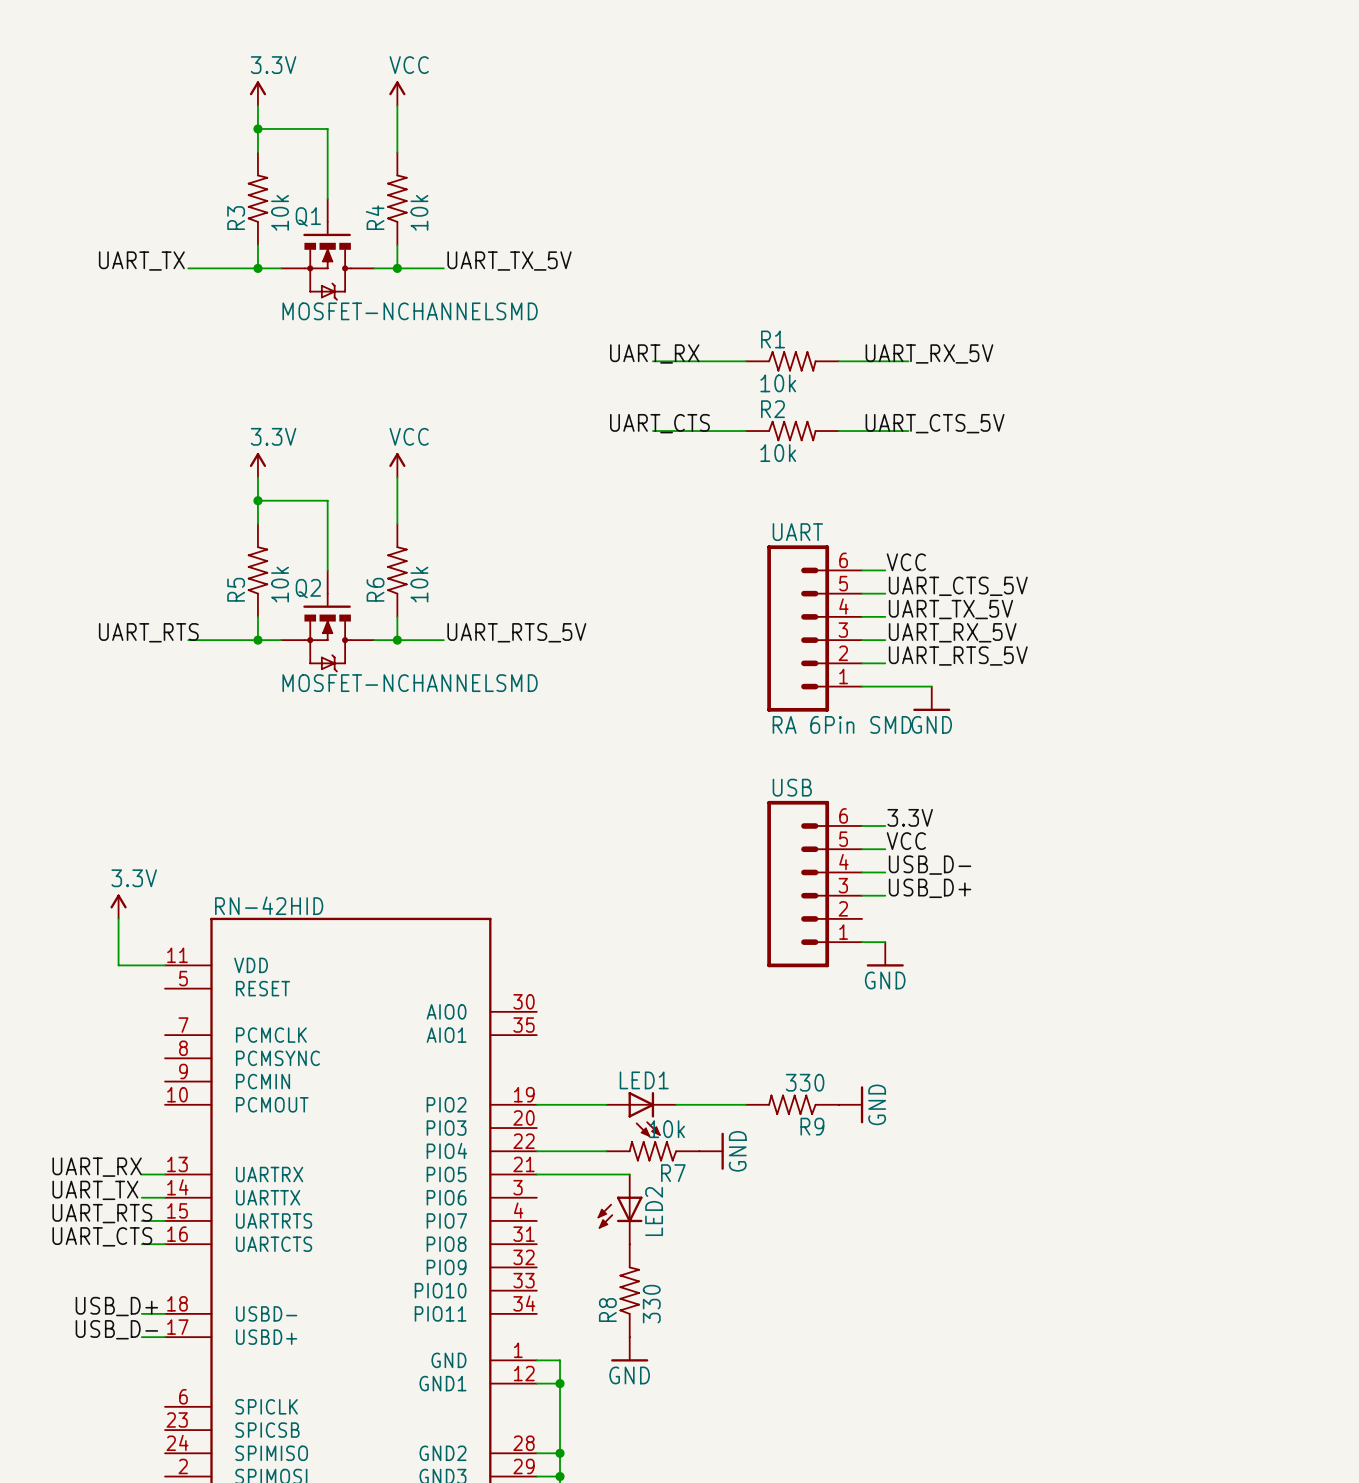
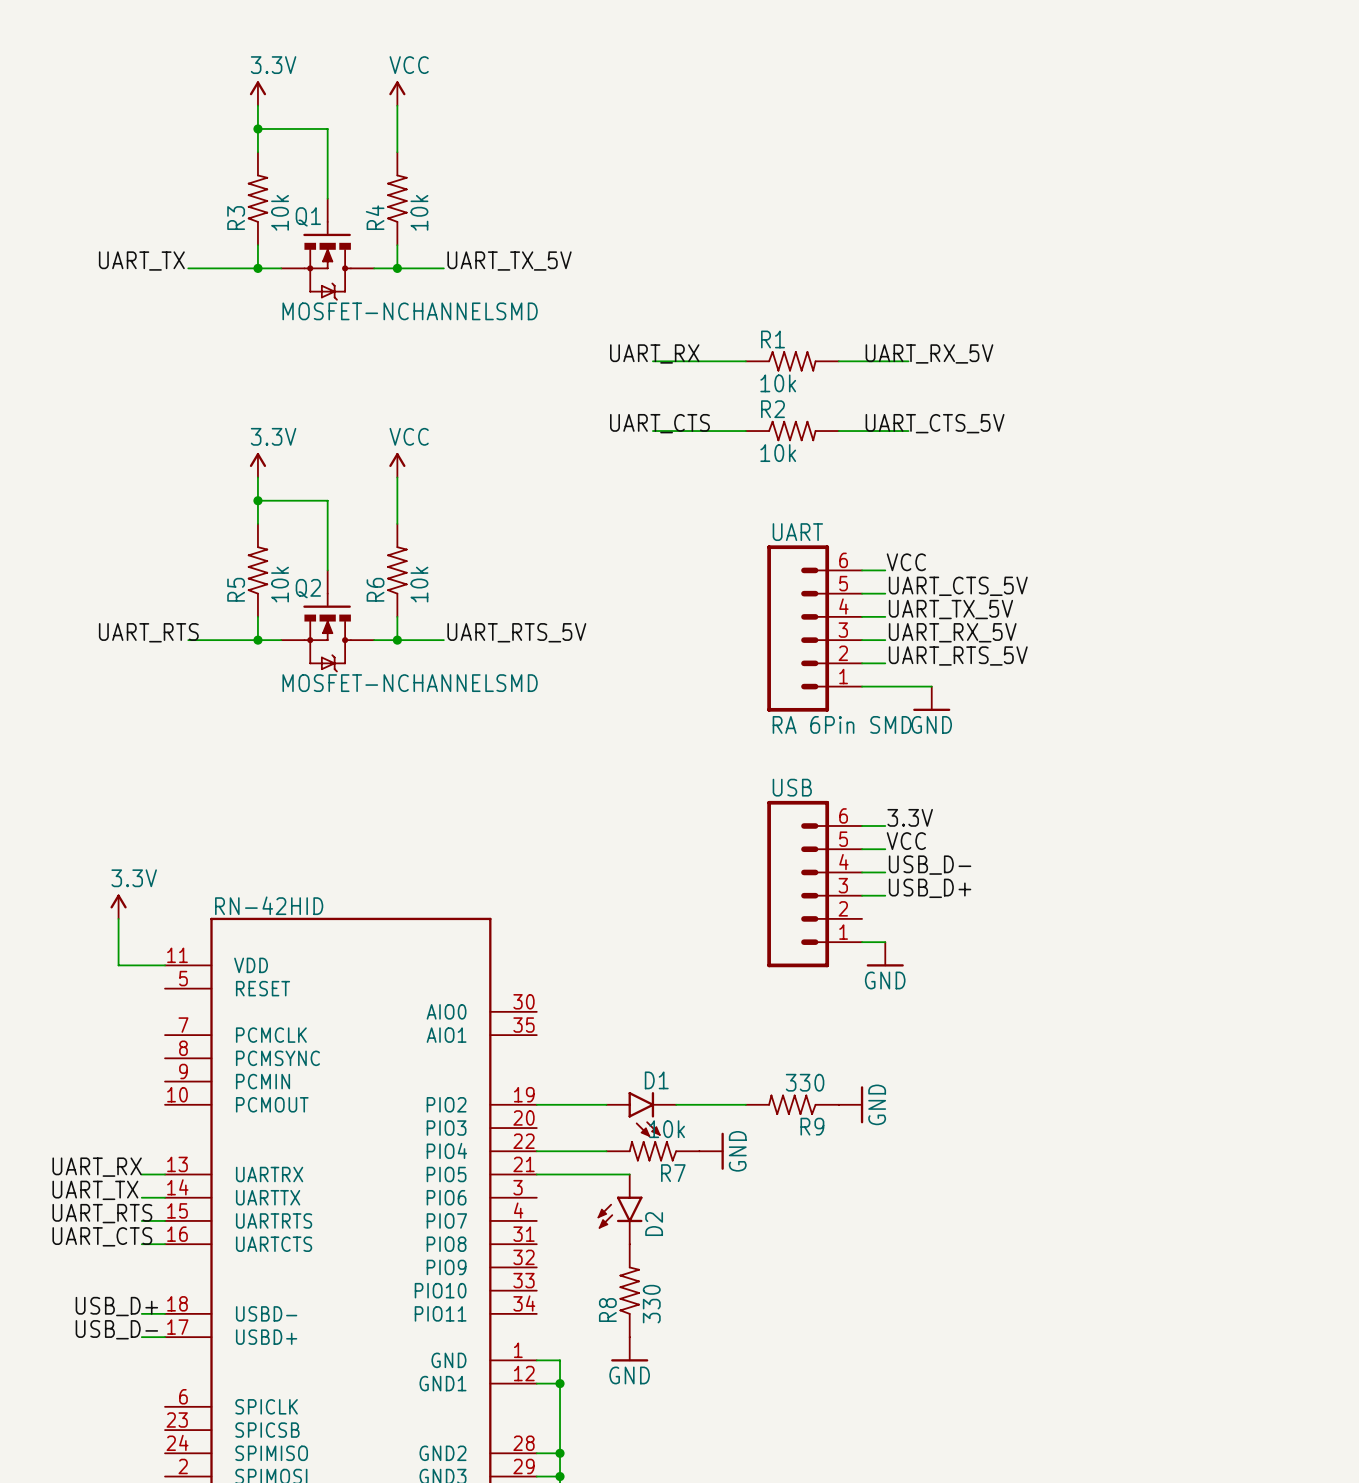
LED1: (641, 1114) -> none
D1: none -> (641, 1114)
LED2: (620, 1209) -> none
D2: none -> (620, 1209)

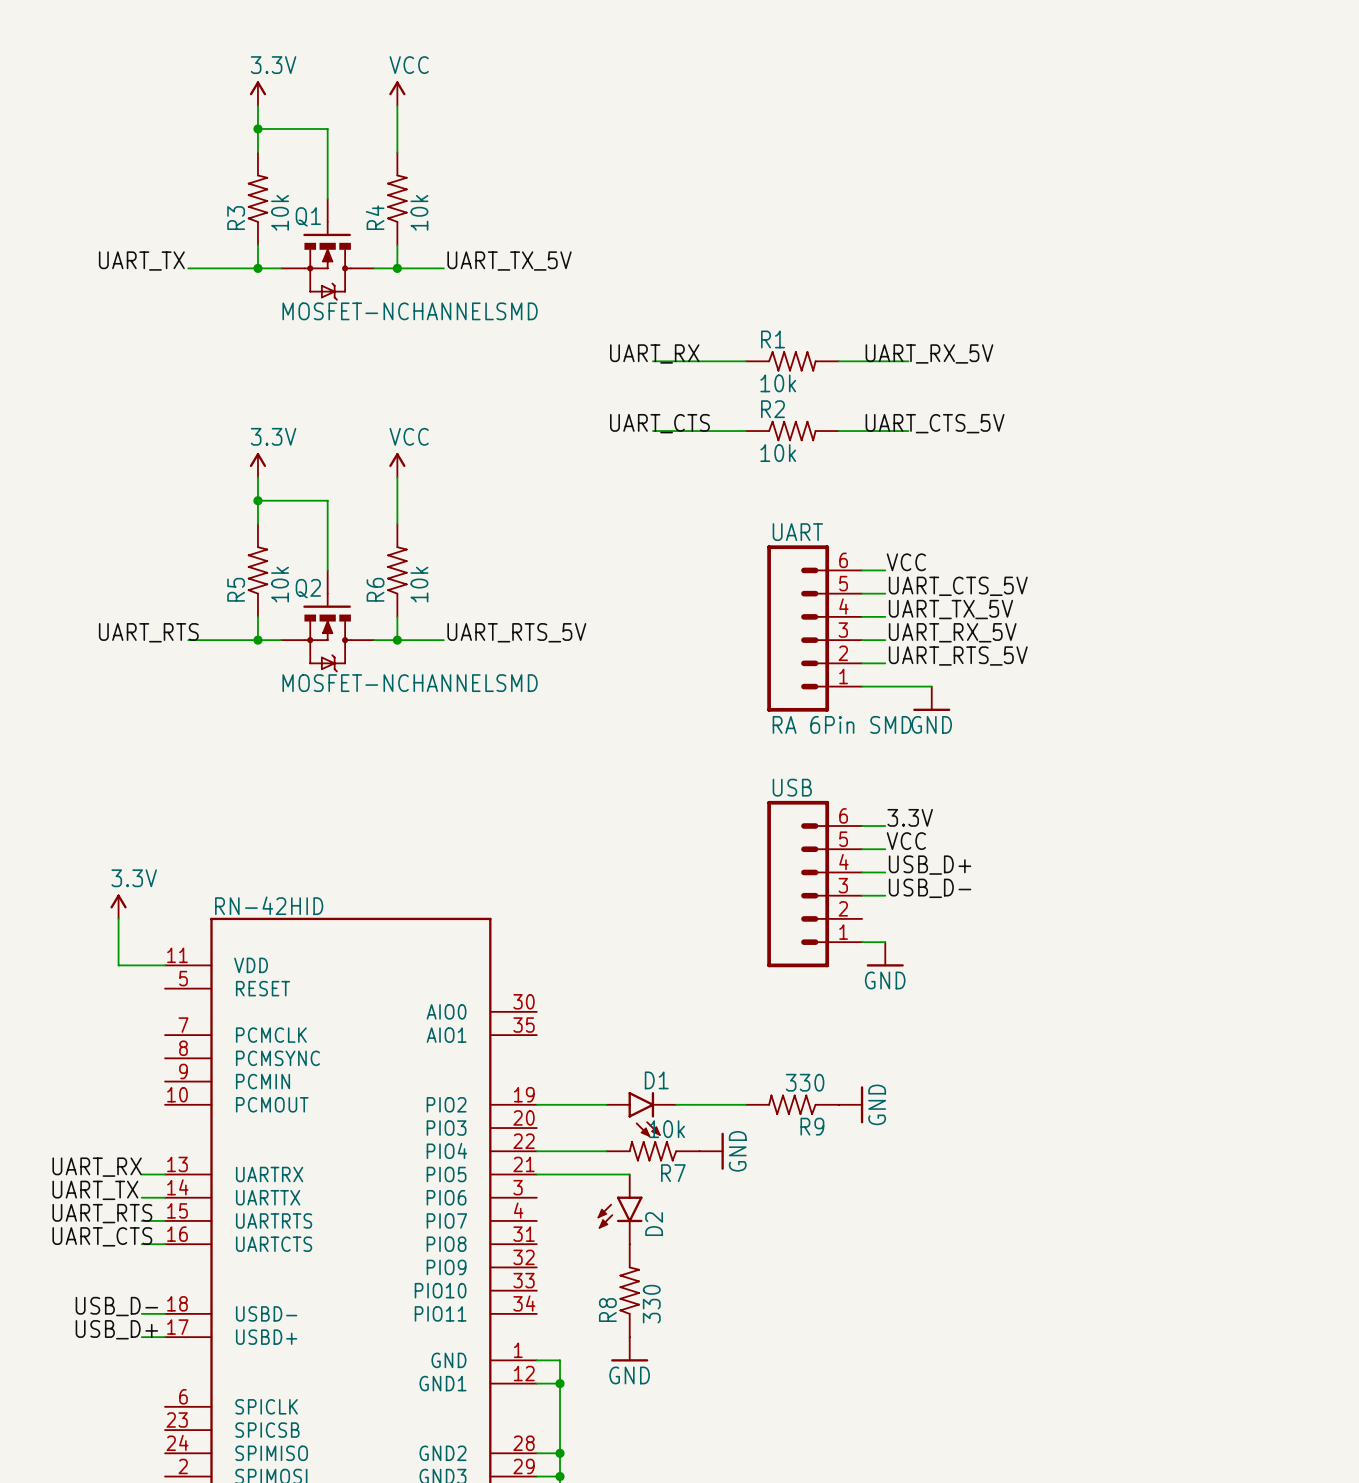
label: USB_D- (930, 865) -> USB_D+ (930, 865)
label: USB_D+ (930, 888) -> USB_D- (930, 888)
label: USB_D+ (116, 1306) -> USB_D- (116, 1306)
label: USB_D- (116, 1329) -> USB_D+ (116, 1329)

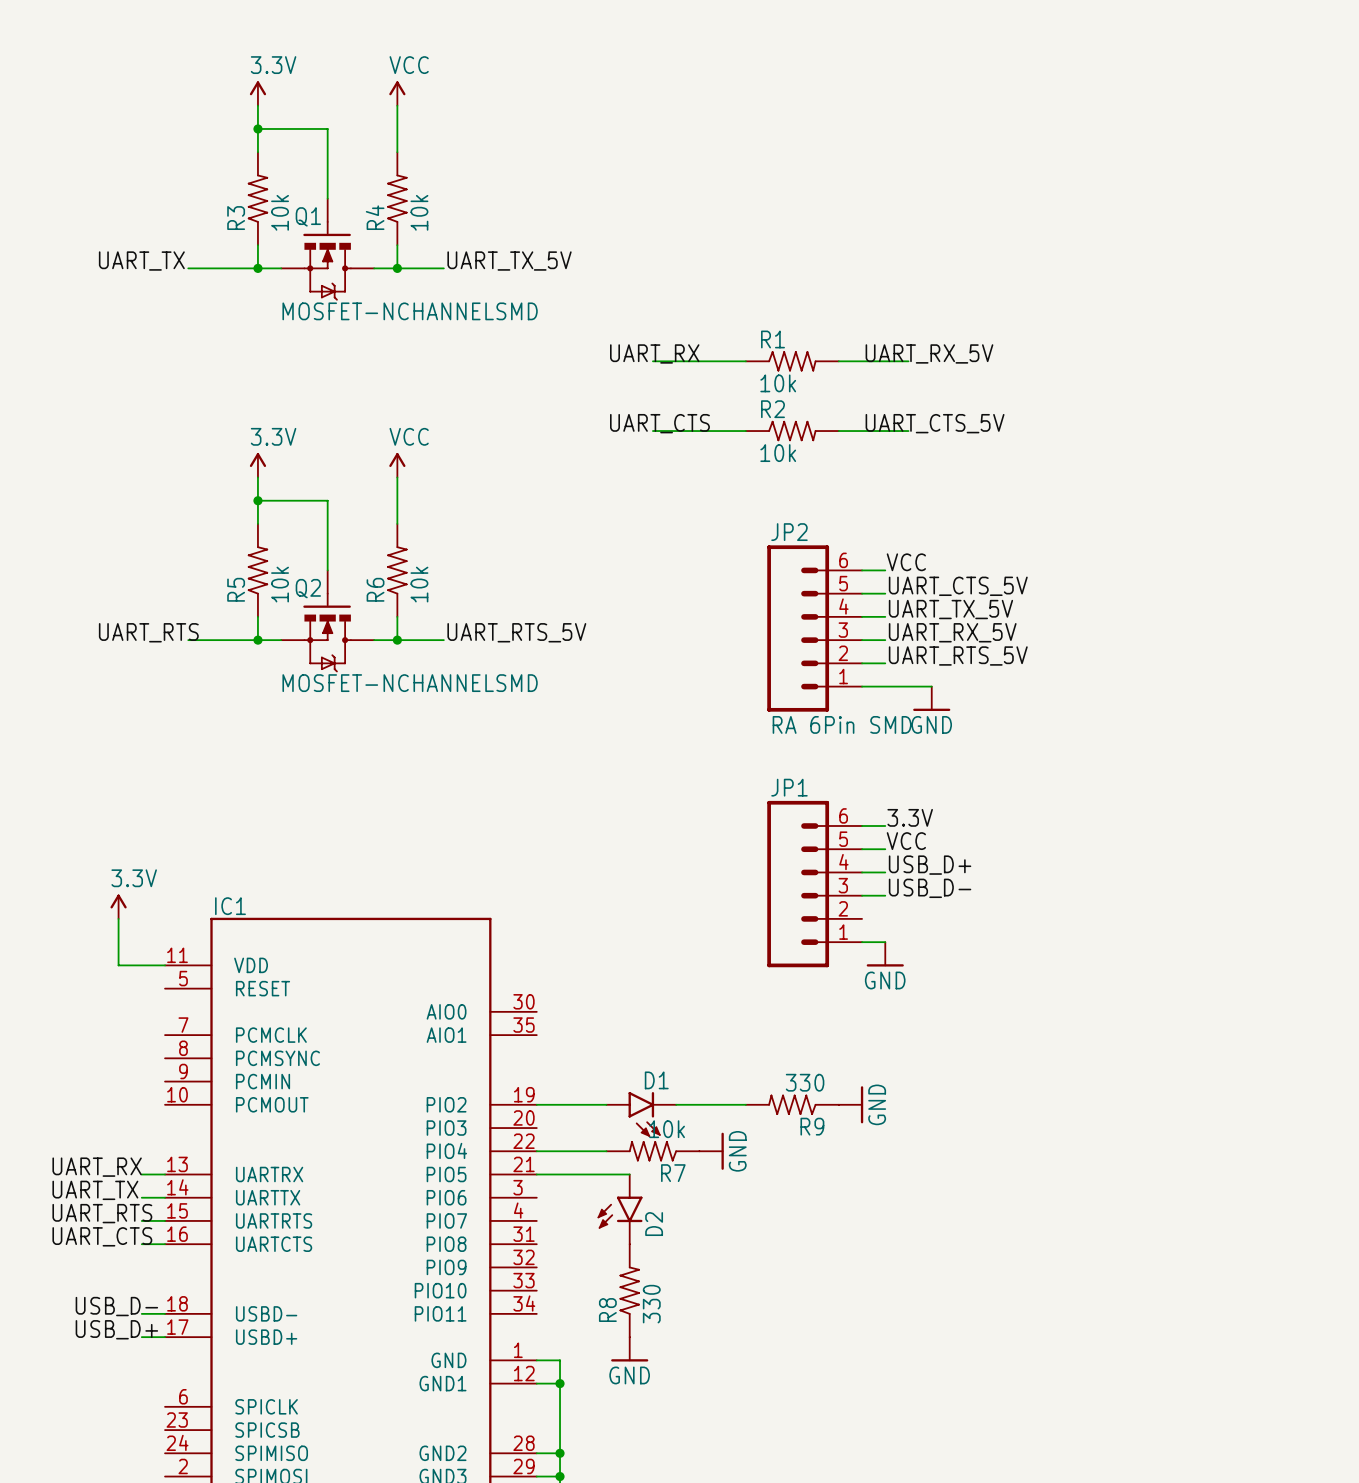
UART name: UART (797, 532) -> JP2 (789, 532)
USB name: USB (792, 787) -> JP1 (789, 787)
RN-42HID name: RN-42HID (269, 905) -> IC1 (230, 906)

